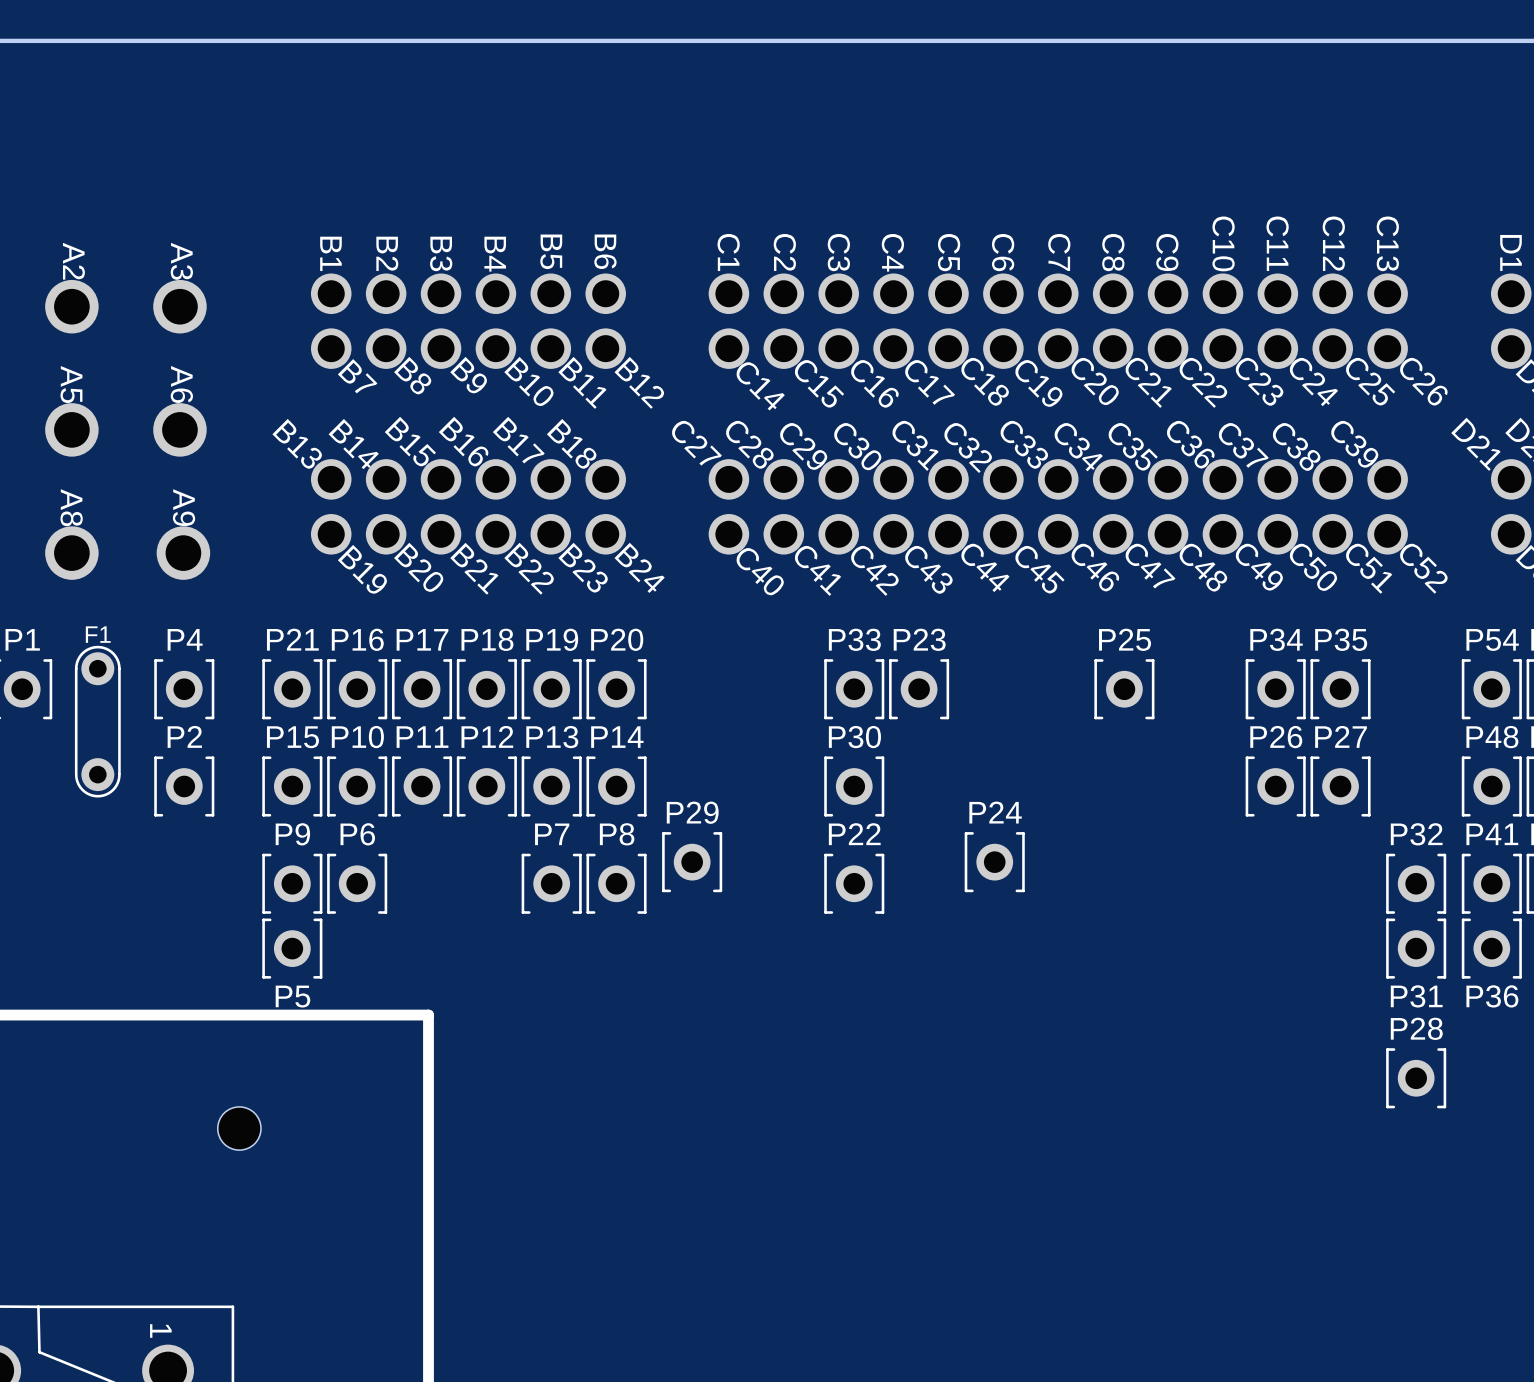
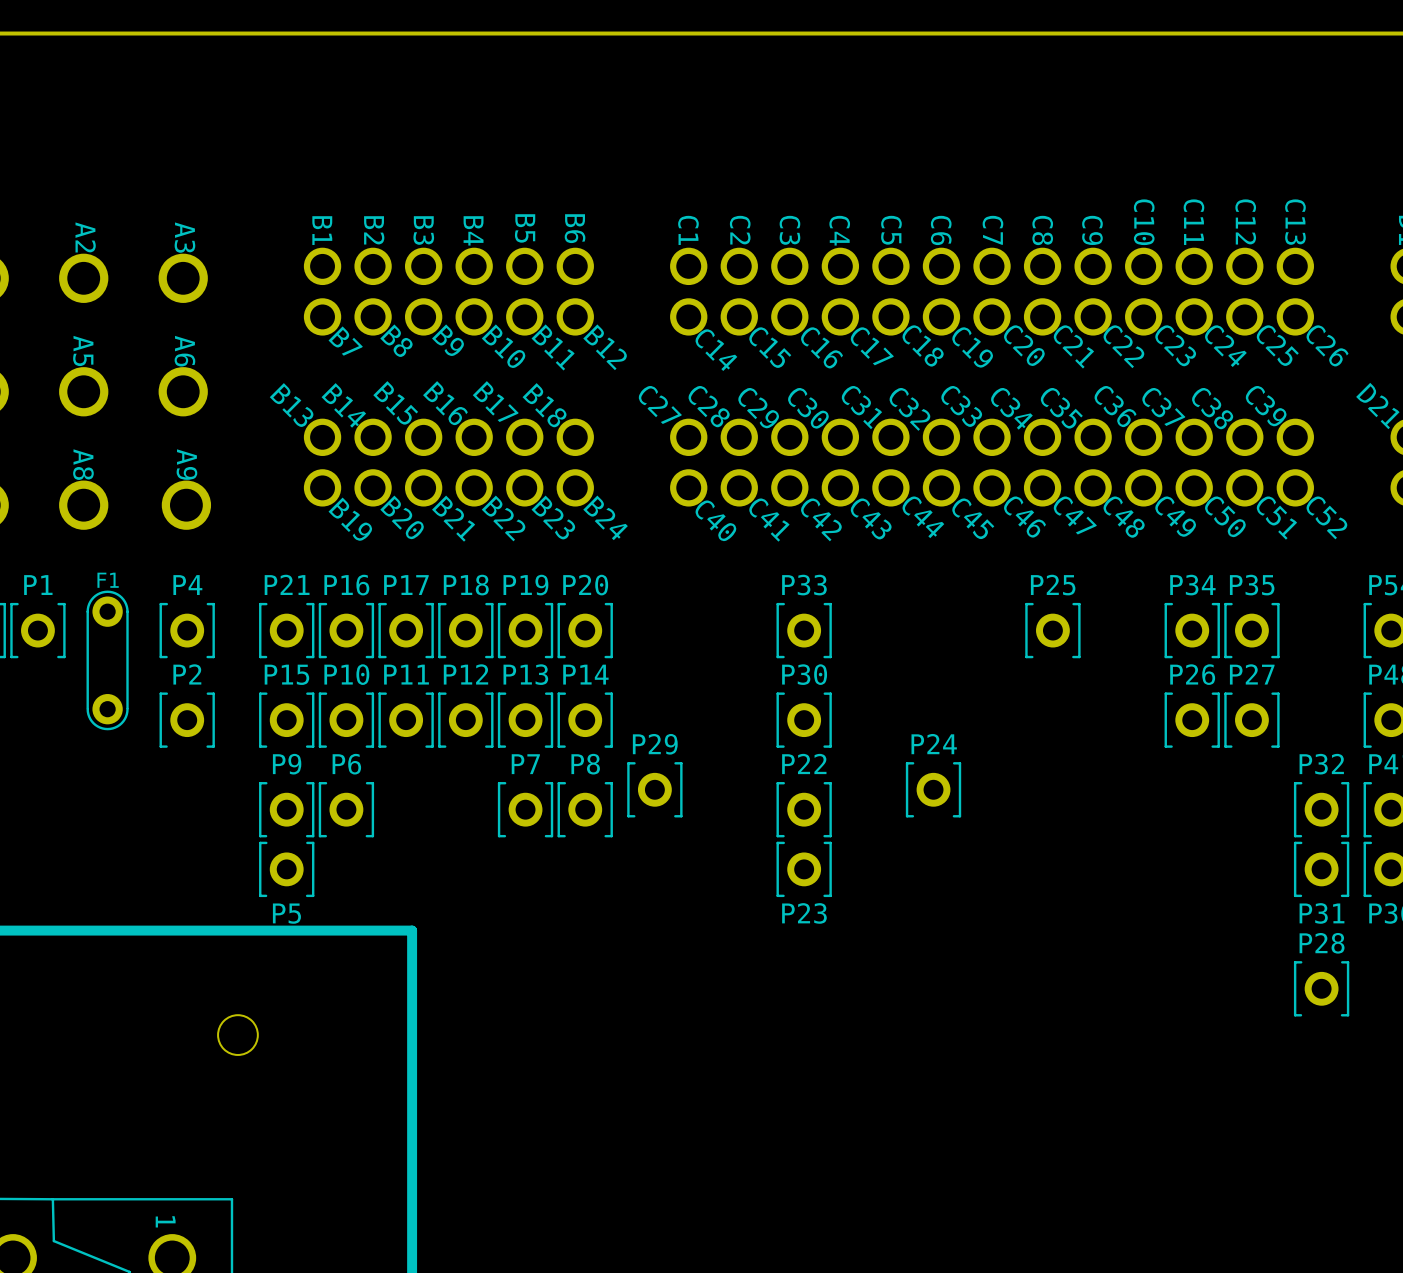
P23 name position: P23 (919, 639) -> P23 (804, 913)
P23 position: (919, 689) -> (804, 869)

